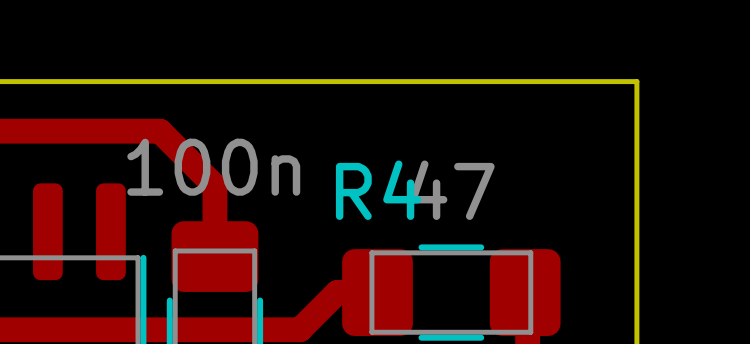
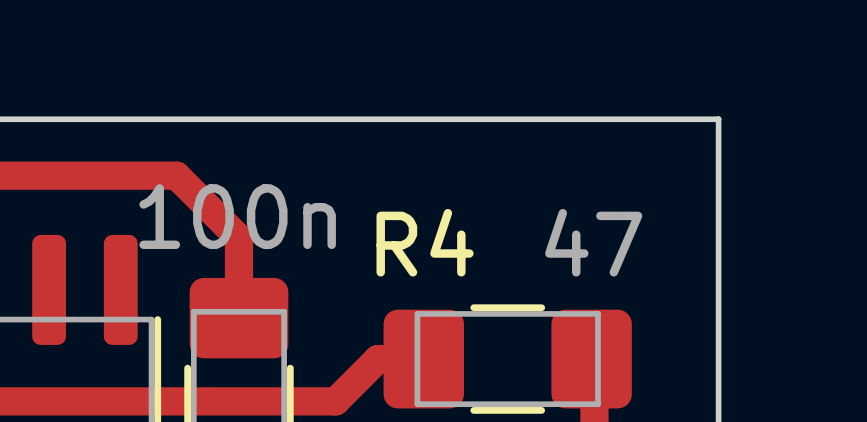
R4 value position: 47 (451, 190) -> 47 (593, 242)

